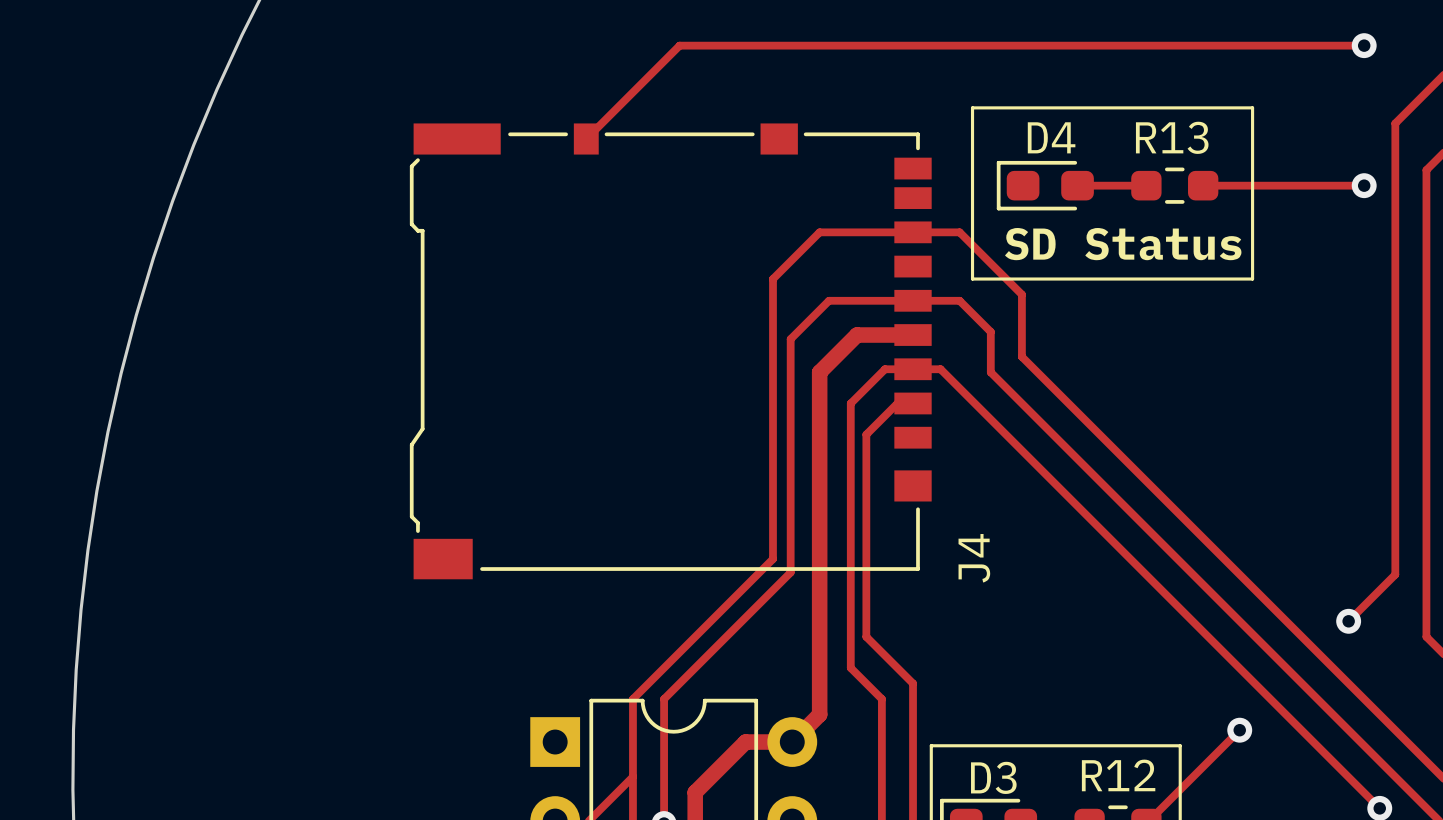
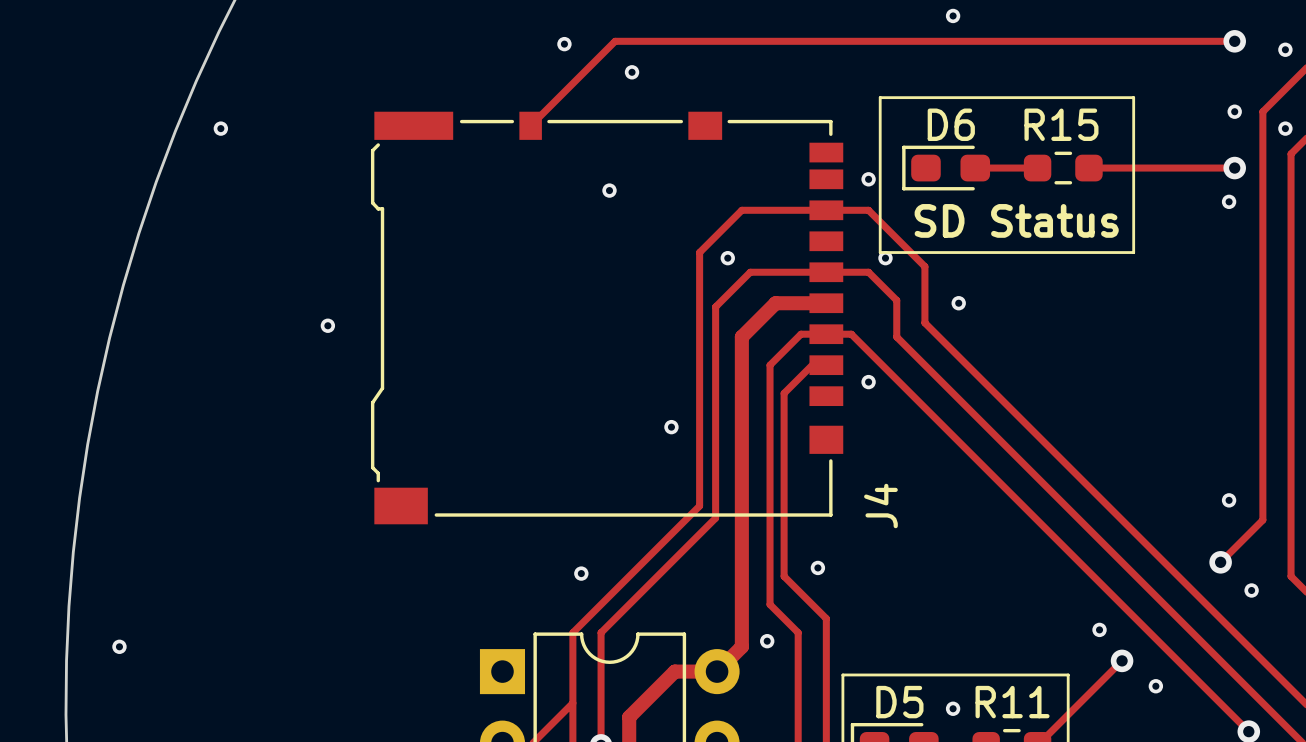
via: none -> (953, 15)
via: none -> (564, 44)
via: none -> (1285, 49)
via: none -> (632, 72)
via: none -> (1234, 111)
D4 name: D4 (1051, 137) -> D6 (951, 124)
R13 name: R13 (1172, 137) -> R15 (1061, 124)
via: none -> (220, 128)
via: none -> (1285, 128)
via: none -> (868, 179)
via: none -> (609, 190)
via: none -> (1229, 201)
via: none -> (727, 258)
via: none -> (885, 258)
via: none -> (958, 303)
via: none -> (327, 325)
via: none -> (868, 382)
via: none -> (671, 427)
via: none -> (1229, 500)
via: none -> (817, 567)
via: none -> (581, 573)
via: none -> (1251, 590)
via: none -> (1099, 629)
via: none -> (767, 641)
via: none -> (119, 646)
via: none -> (1155, 686)
R12 name: R12 (1118, 775) -> R11 (1012, 702)
D3 name: D3 (993, 777) -> D5 (899, 702)
via: none -> (953, 708)

